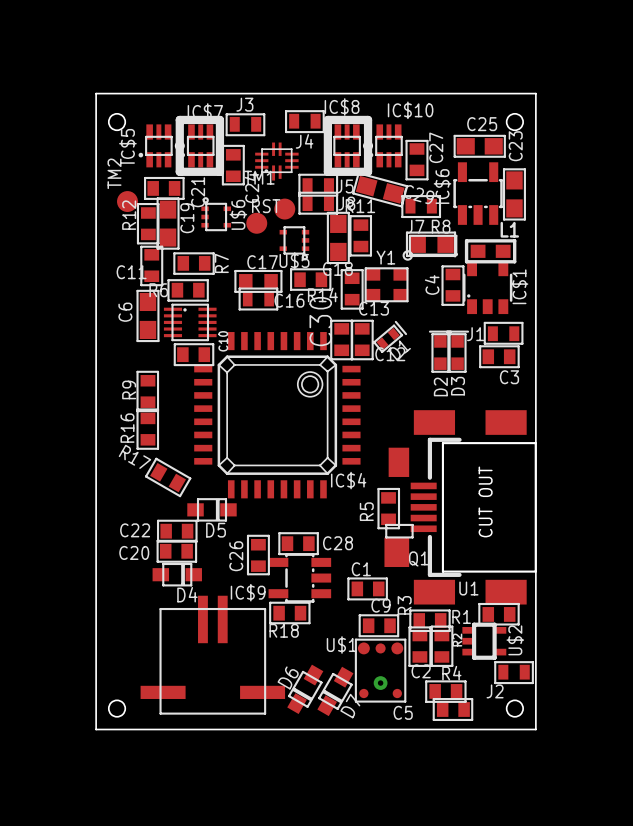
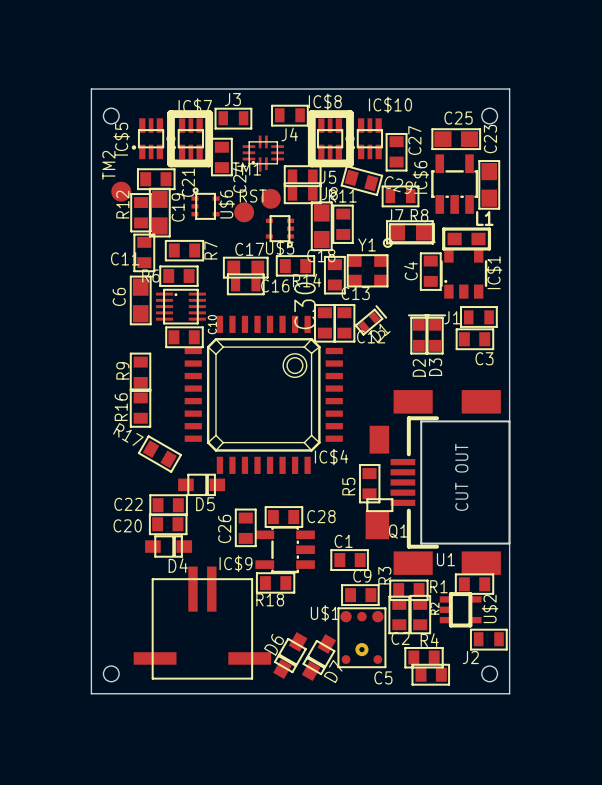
C29 footprint: [352, 172, 409, 208] -> [340, 165, 384, 196]

